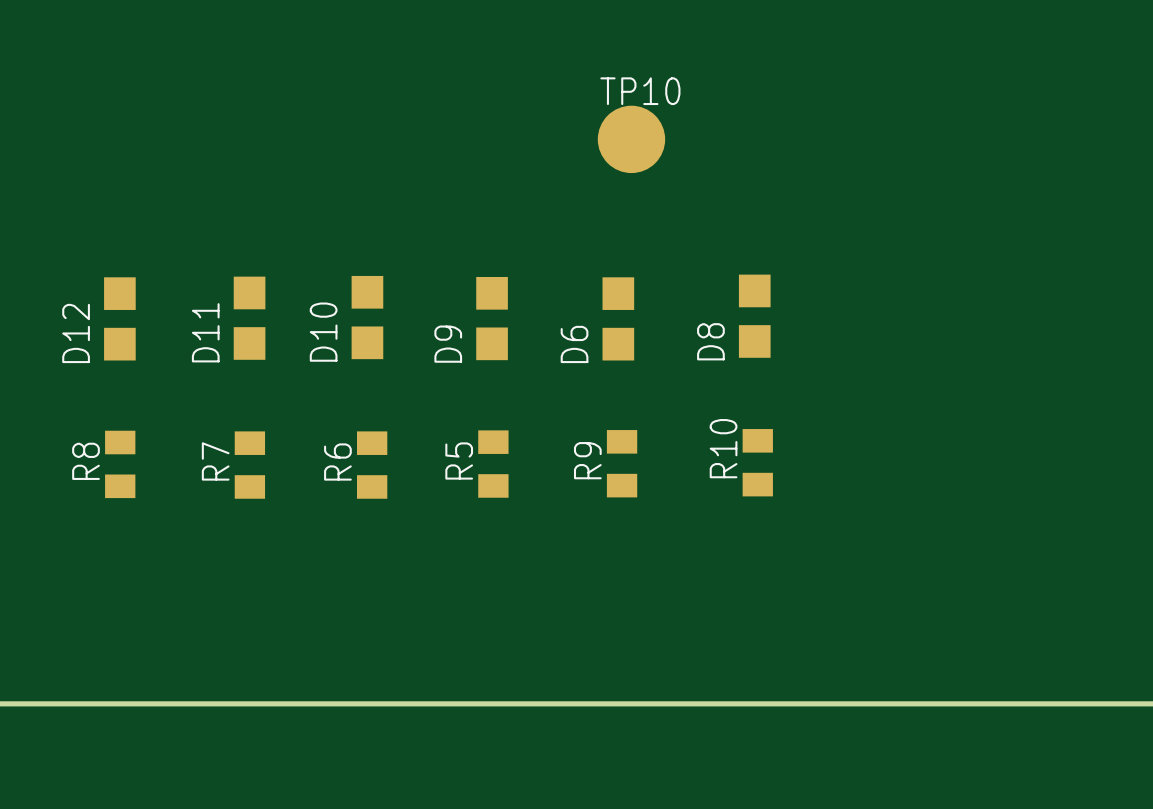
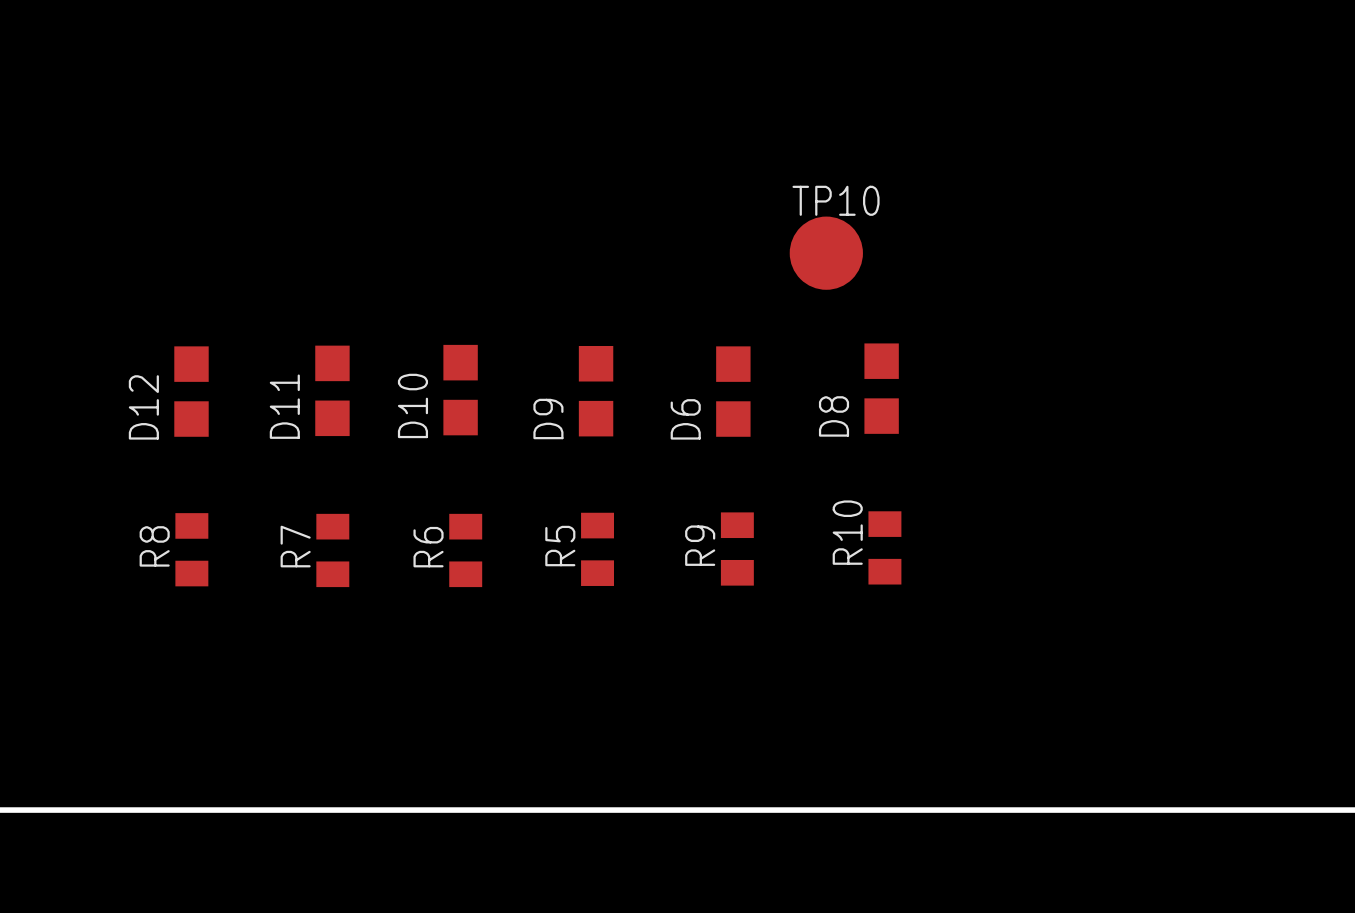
TP10 position: (631, 139) -> (826, 253)

